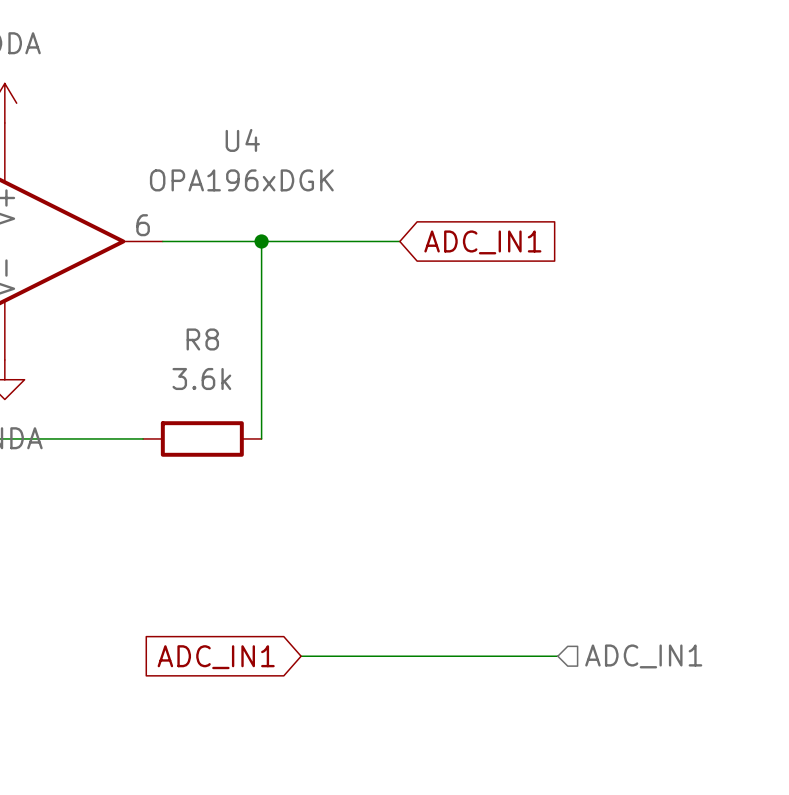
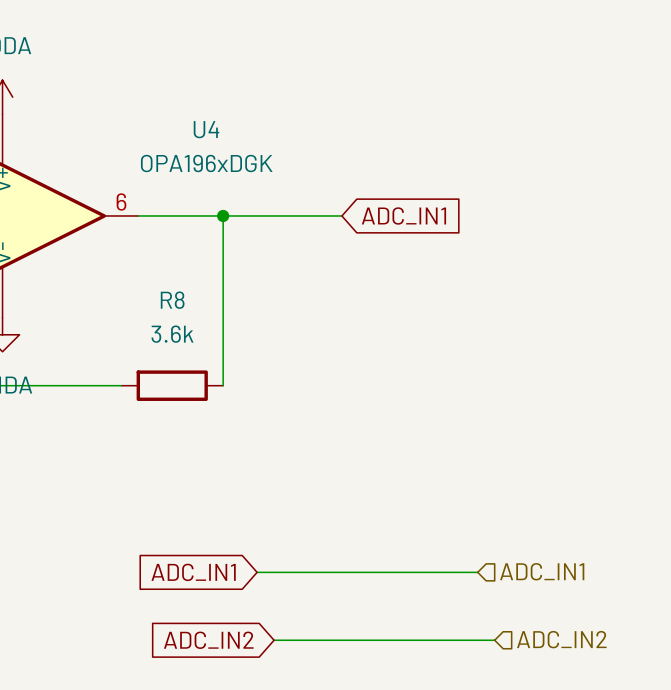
wire: none -> (274, 640) (494, 640)
hierarchical label: none -> ADC_IN2 (561, 639)
global label: none -> ADC_IN2 (208, 640)

